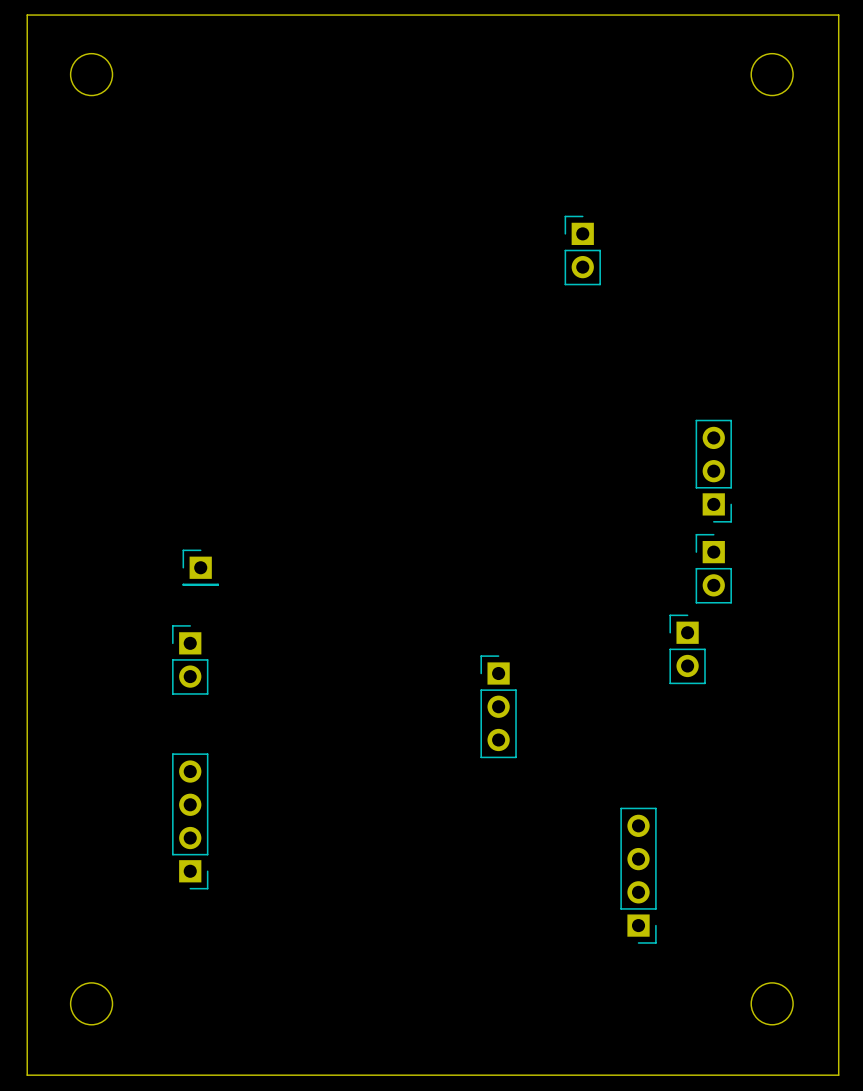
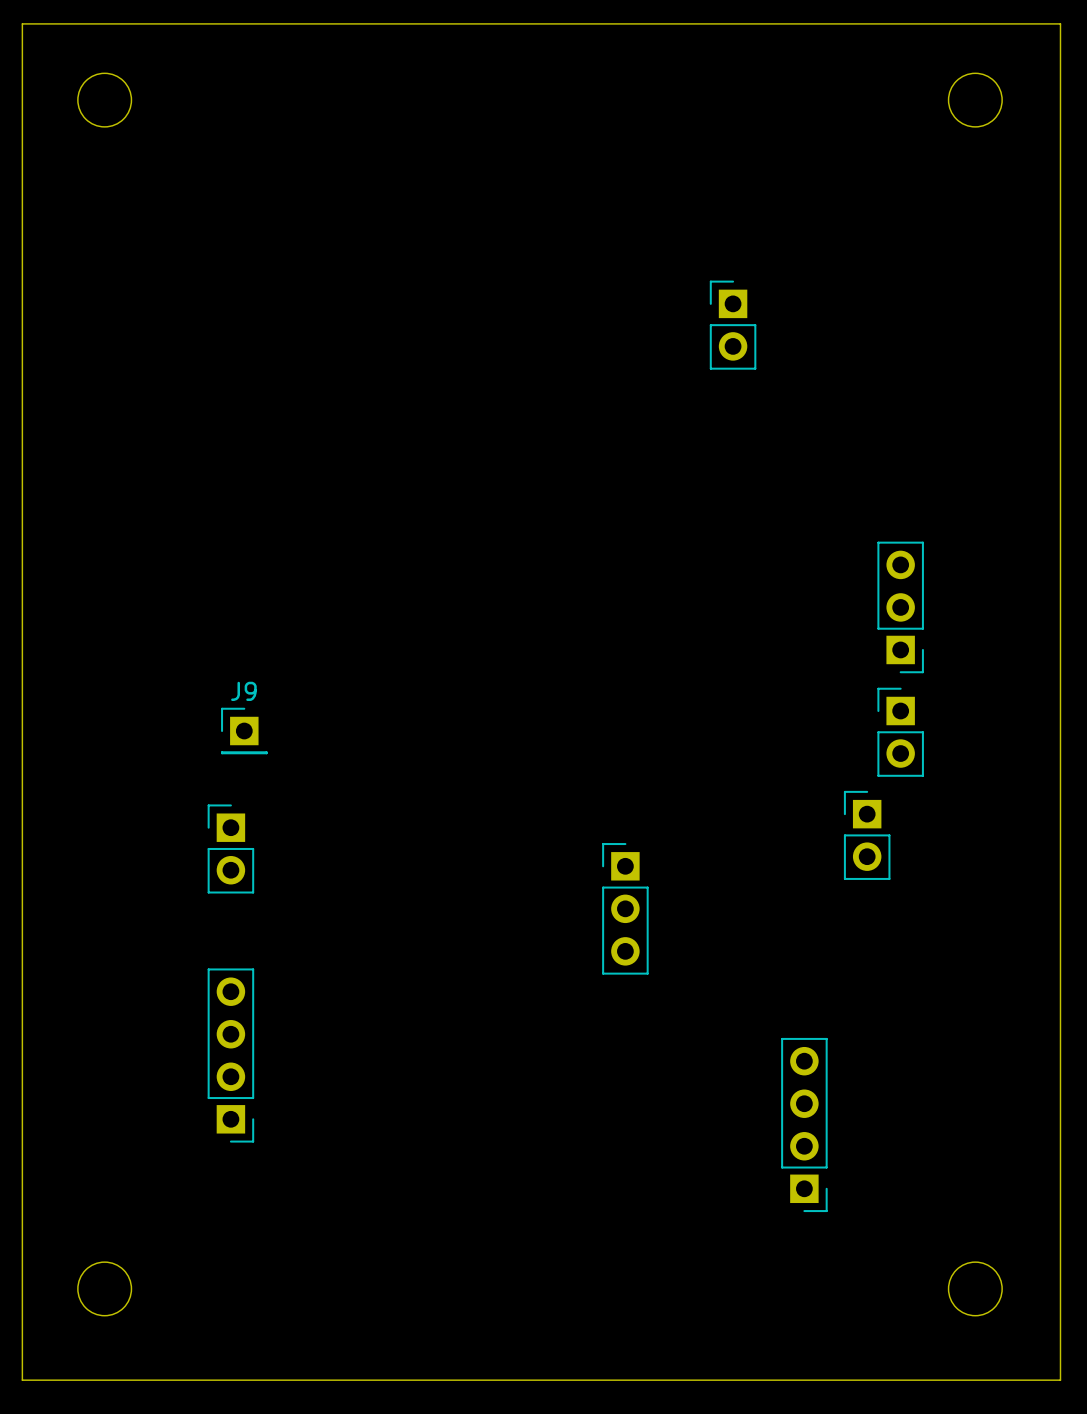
J9 name: none -> J9 (243, 691)

